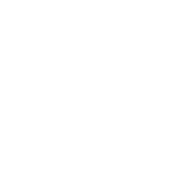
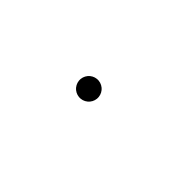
junction: none -> (88, 88)

